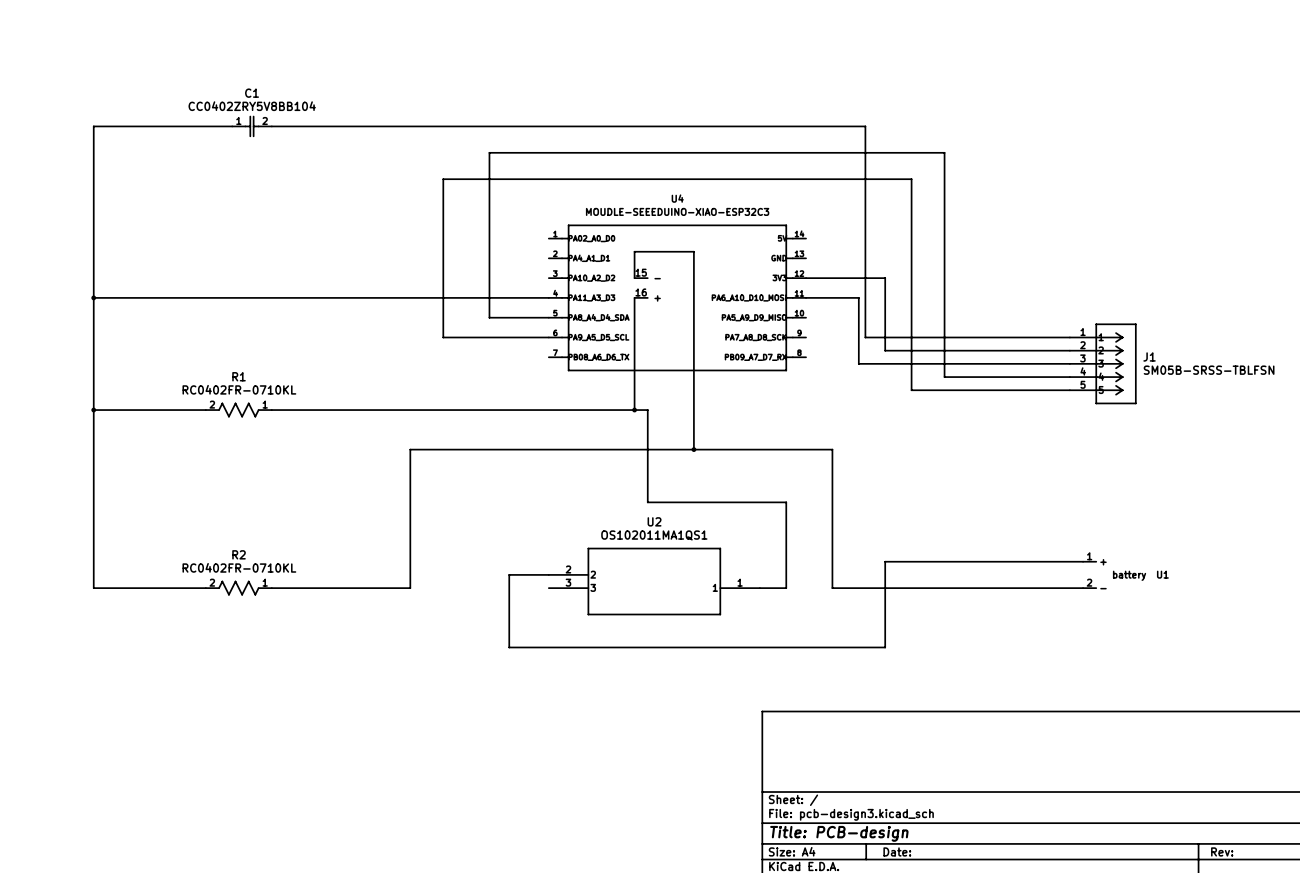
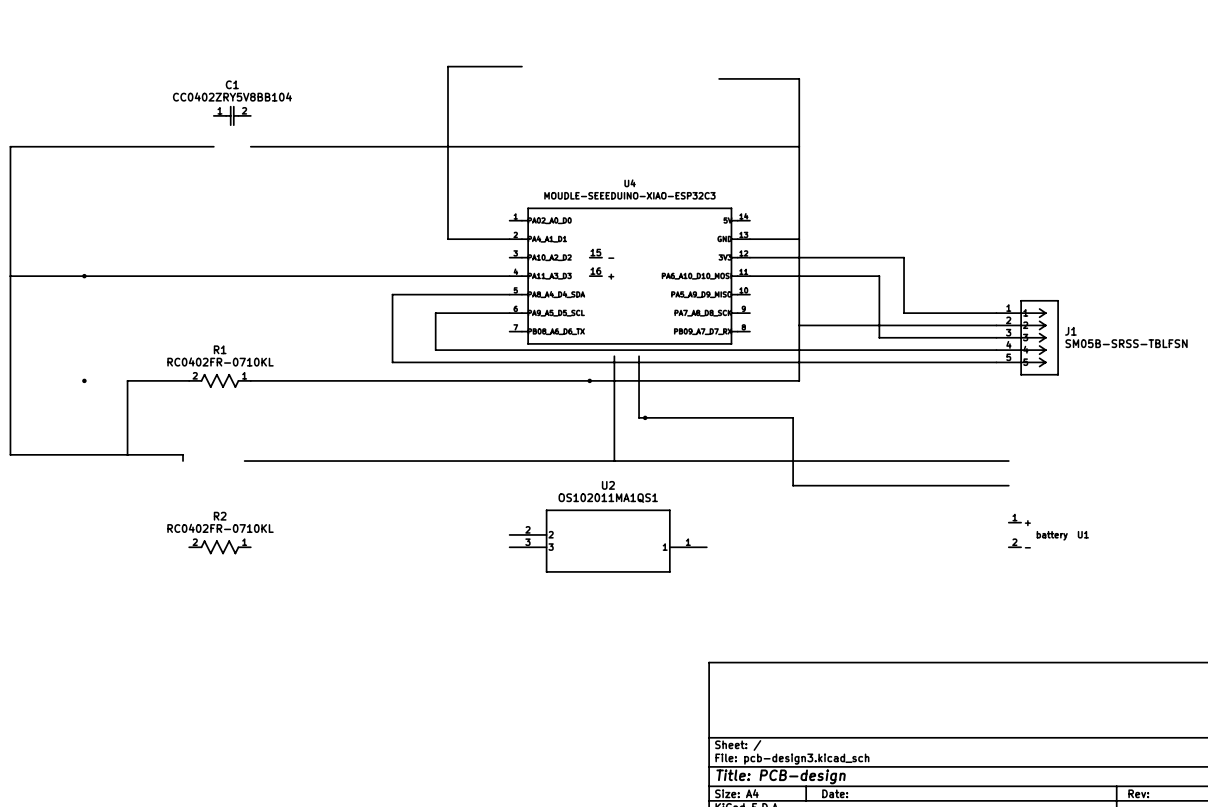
wire: none -> (521, 66) (448, 66) (448, 239) (509, 239)
wire: (232, 126) (93, 126) (93, 588) (205, 588) -> none
wire: (271, 126) (865, 126) (865, 337) (970, 337) -> (823, 257) (904, 257) (904, 313)
wire: none -> (213, 146) (10, 146) (10, 454) (183, 454) (183, 461)
wire: none -> (250, 146) (799, 146)
wire: none -> (749, 239) (799, 239)
wire: (634, 278) (634, 251) (693, 251) (693, 449) -> none
wire: (885, 278) (885, 350) -> (799, 325) (823, 325)
wire: none -> (10, 276) (84, 276)
wire: (634, 297) (634, 410) -> (614, 356) (614, 461)
wire: (944, 297) (944, 152) (489, 152) (489, 317) -> (879, 276) (799, 276) (799, 78) (719, 78)
wire: (469, 337) (443, 337) (443, 179) (911, 179) (911, 390) -> (454, 294) (392, 294) (392, 362) (848, 362)
wire: (858, 363) (944, 363) (944, 377) -> (435, 313) (435, 350) (879, 350)
wire: (93, 410) (139, 410) -> (127, 454) (127, 380)
wire: (647, 410) (647, 502) (786, 502) (786, 588) (759, 588) -> (602, 380) (799, 380) (799, 337)
wire: (687, 449) (410, 449) (410, 588) (271, 588) -> (639, 417) (639, 356)
wire: (832, 449) (832, 588) (1083, 588) -> (774, 417) (793, 417) (793, 485) (1008, 485)
wire: none -> (244, 461) (1008, 461)
wire: (1083, 561) (885, 561) (885, 647) (509, 647) (509, 574) (548, 574) -> none

